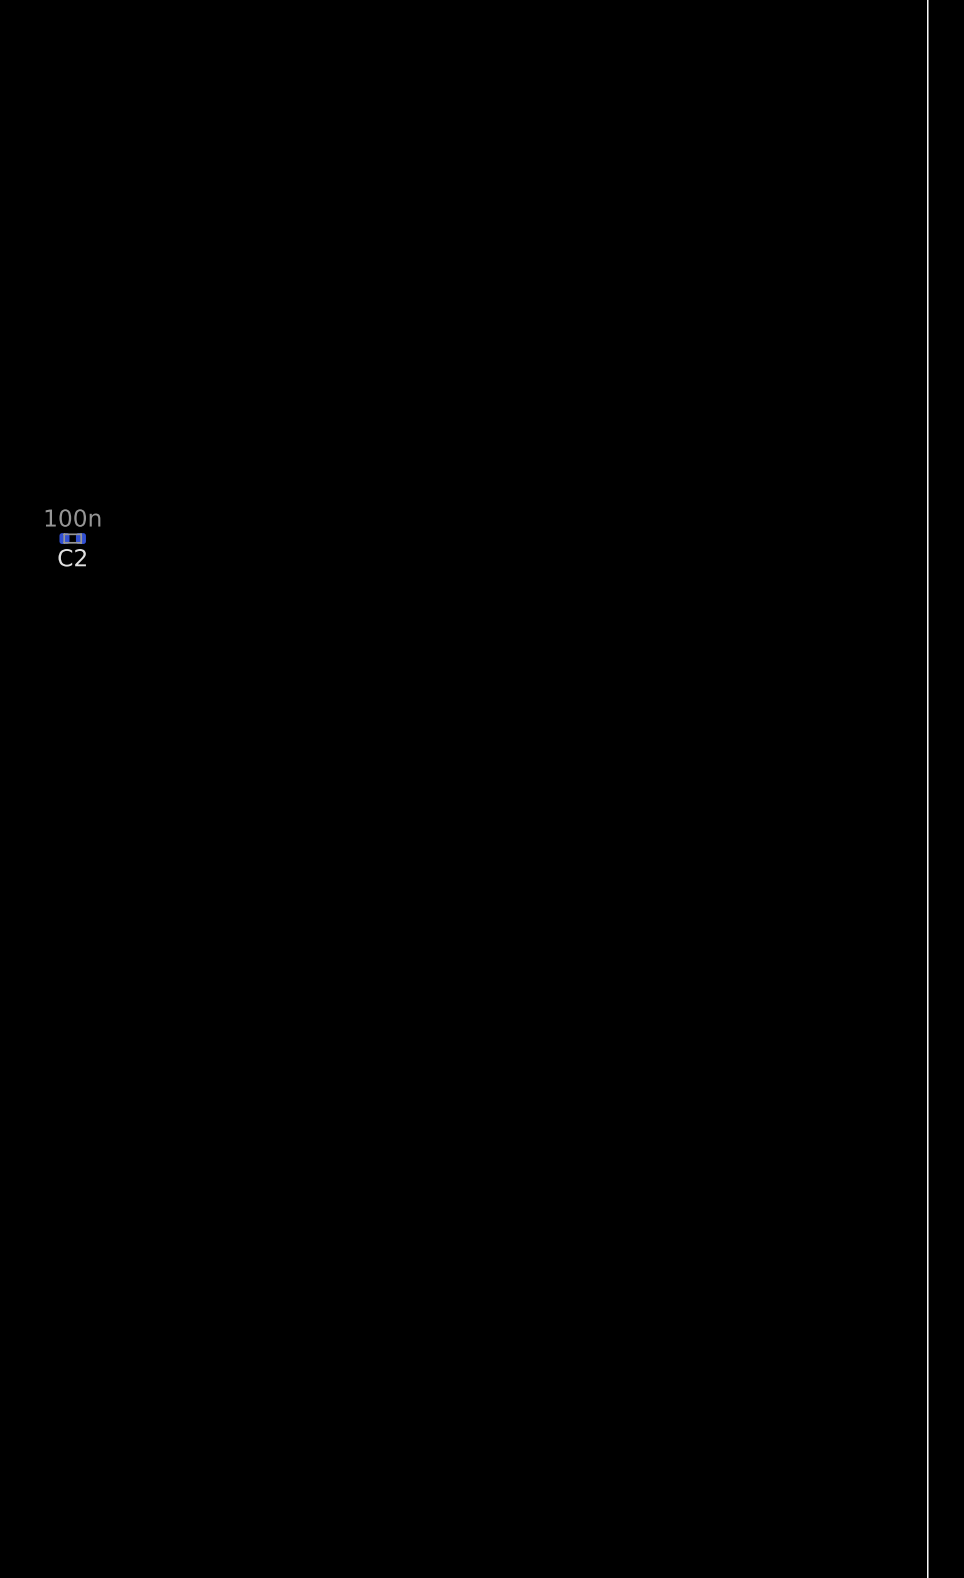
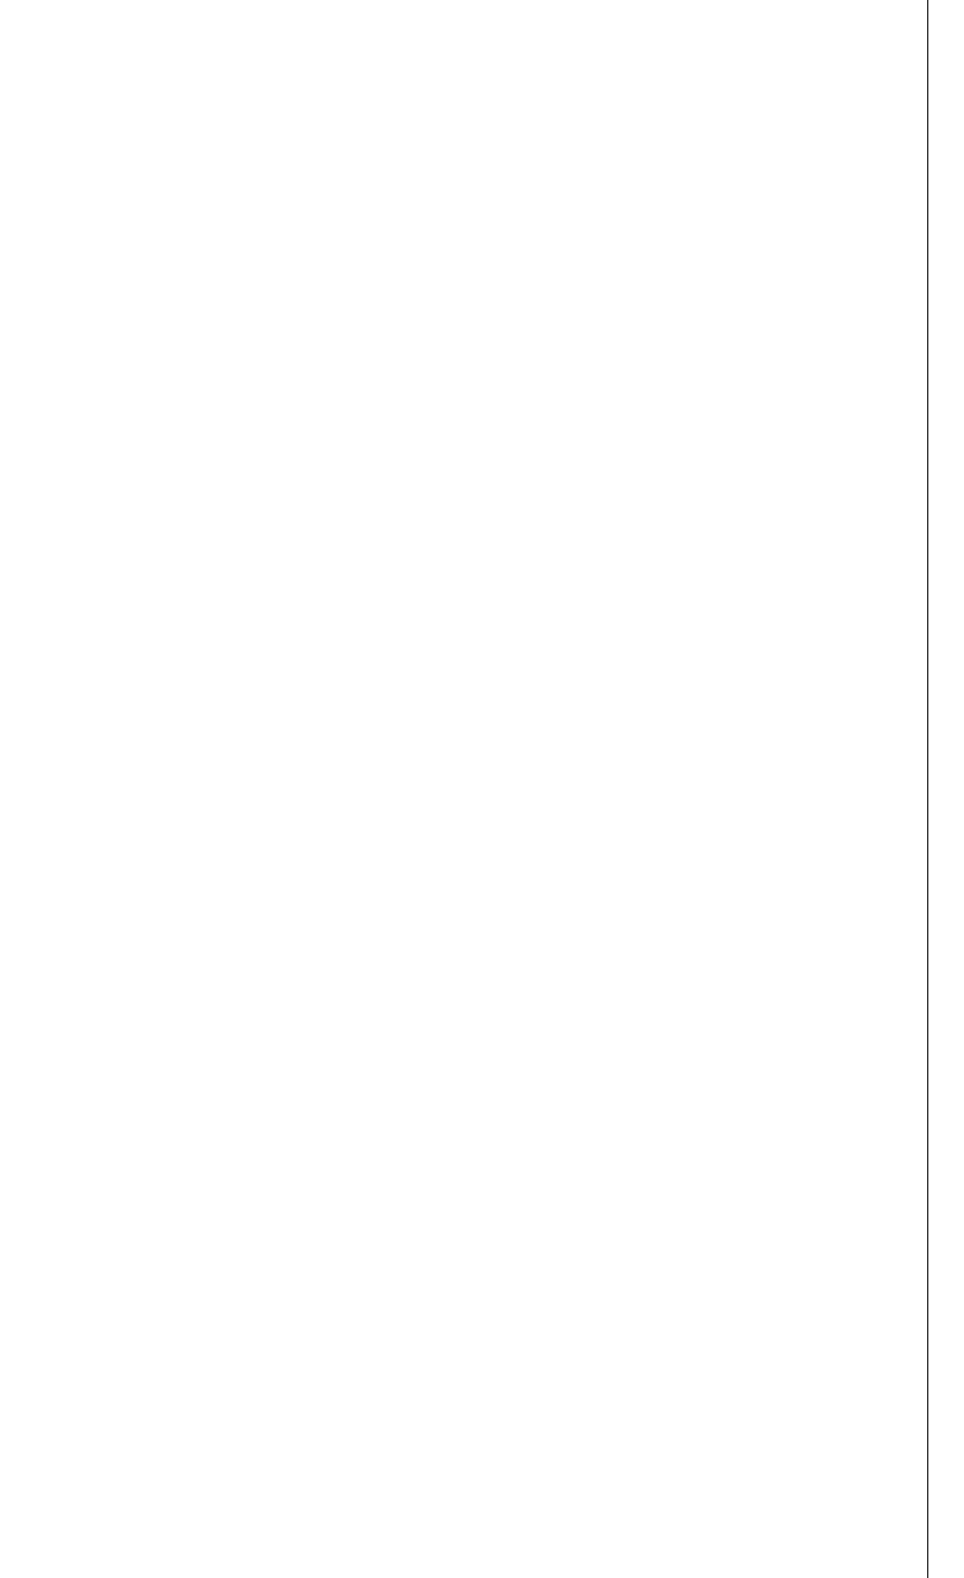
C2: 100n (72, 538) -> none

